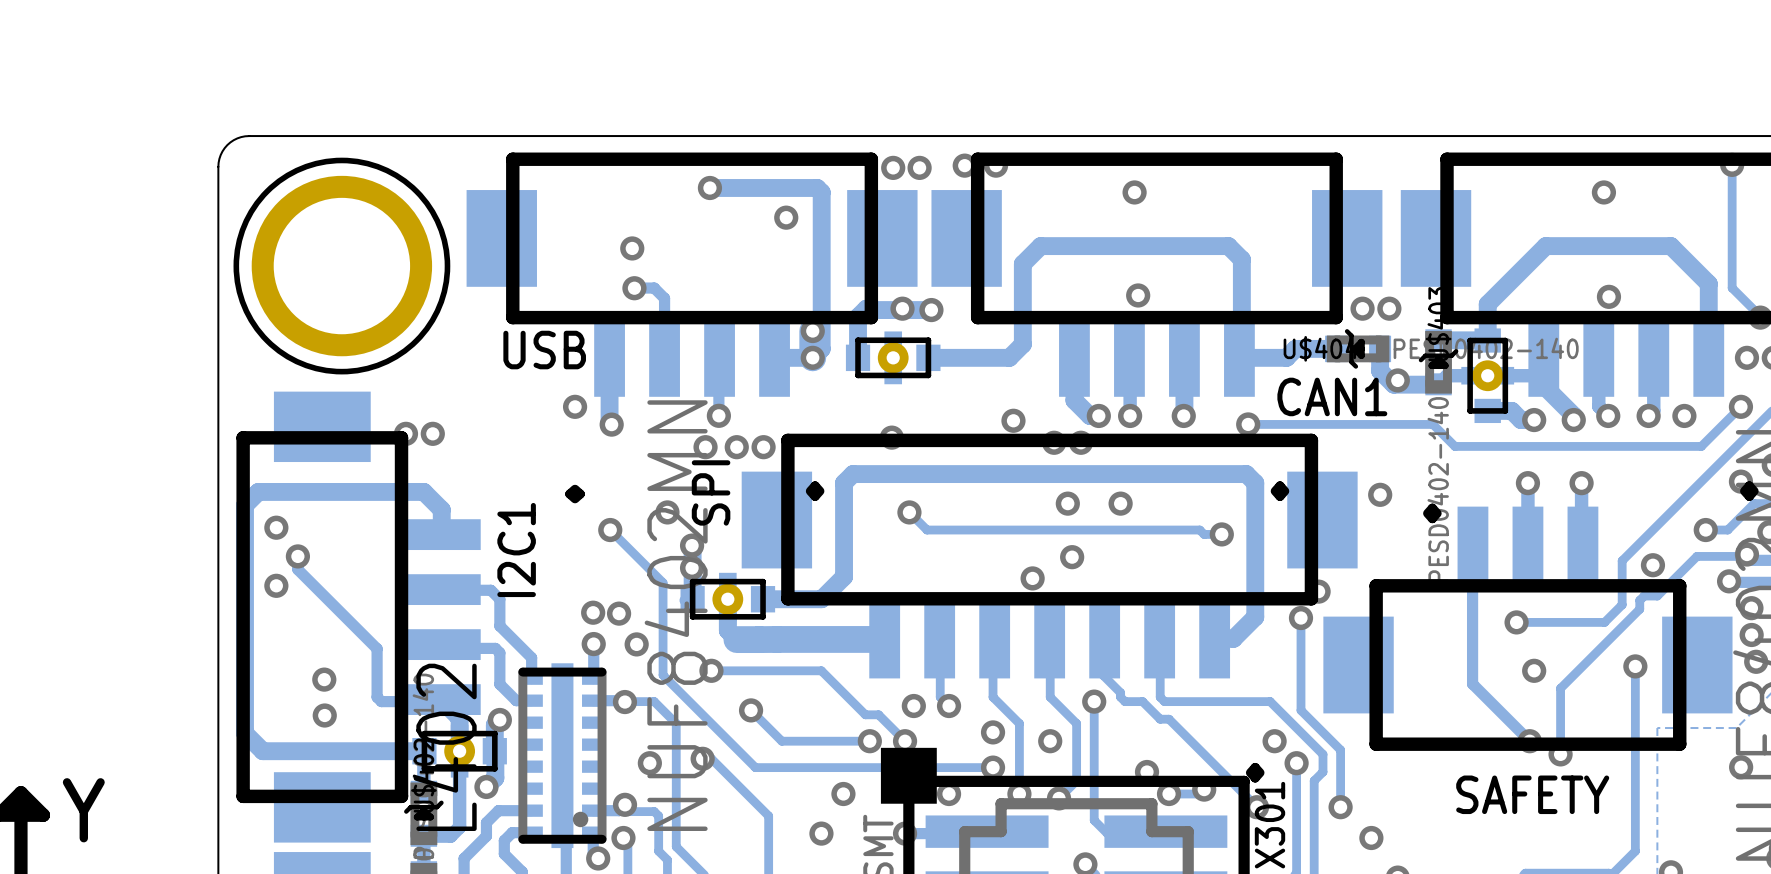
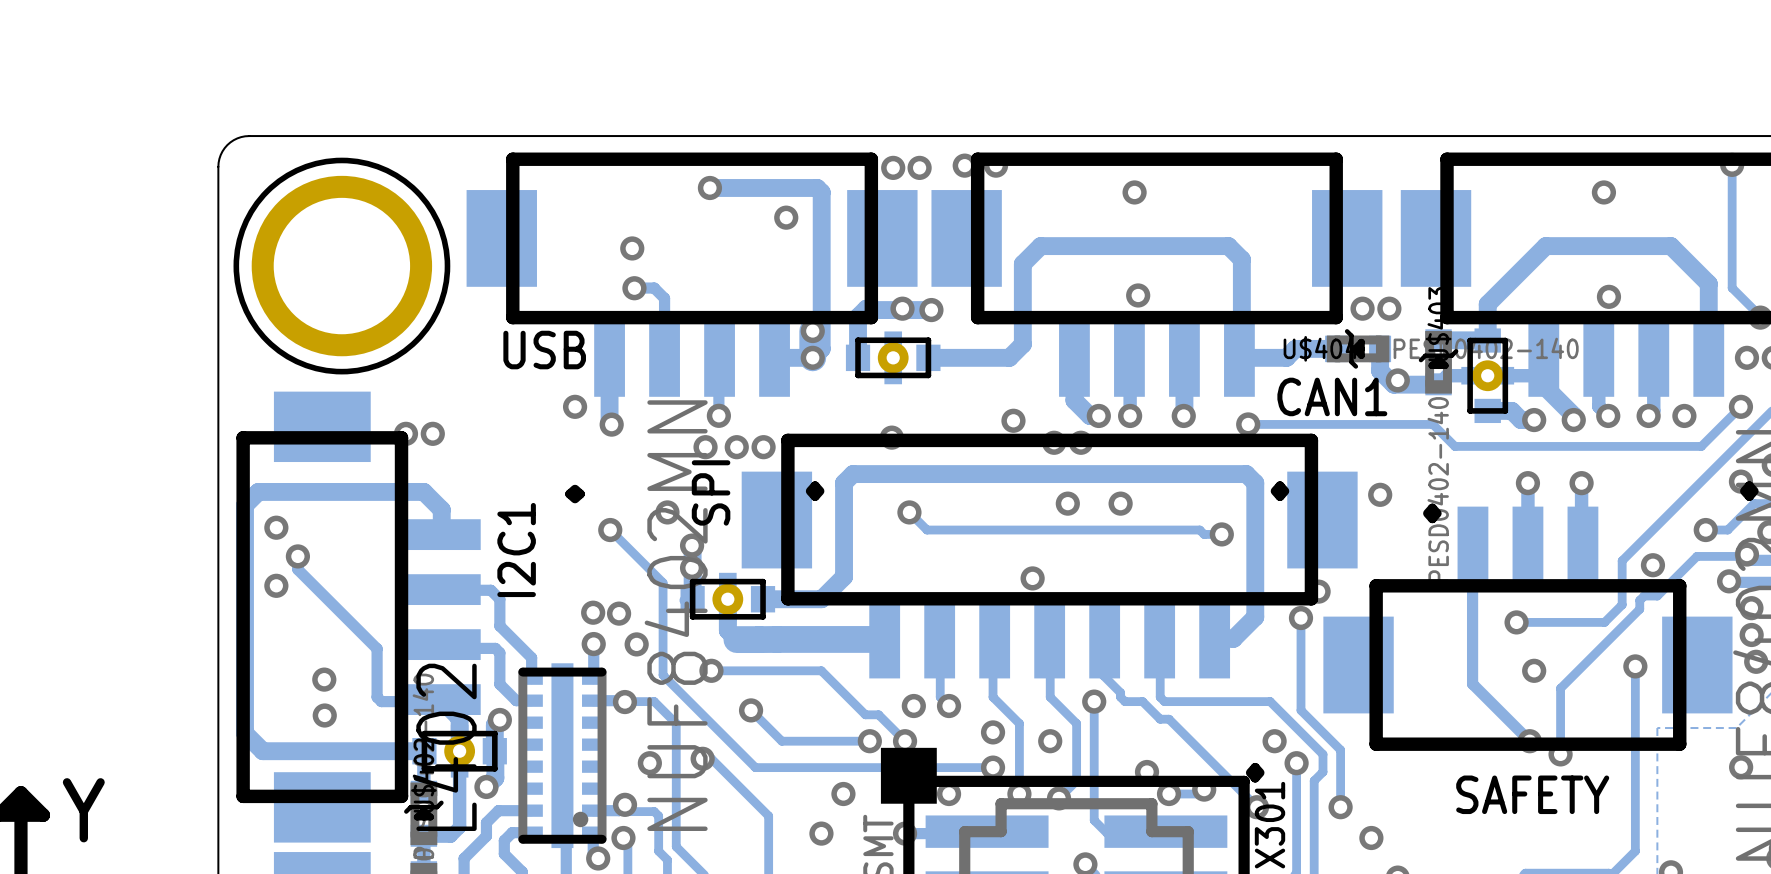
via: (1072, 557) -> none

